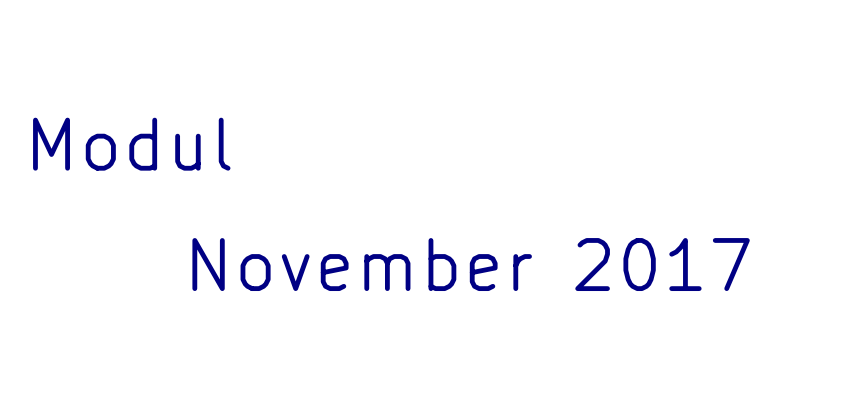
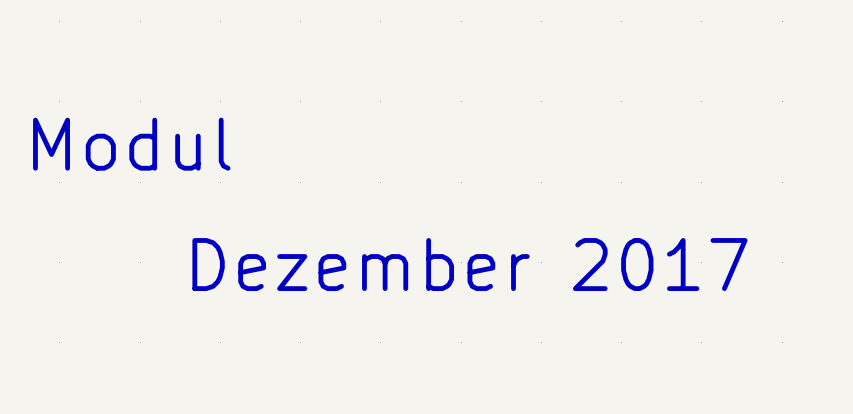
text: November 2017 (471, 264) -> Dezember 2017 (469, 264)

